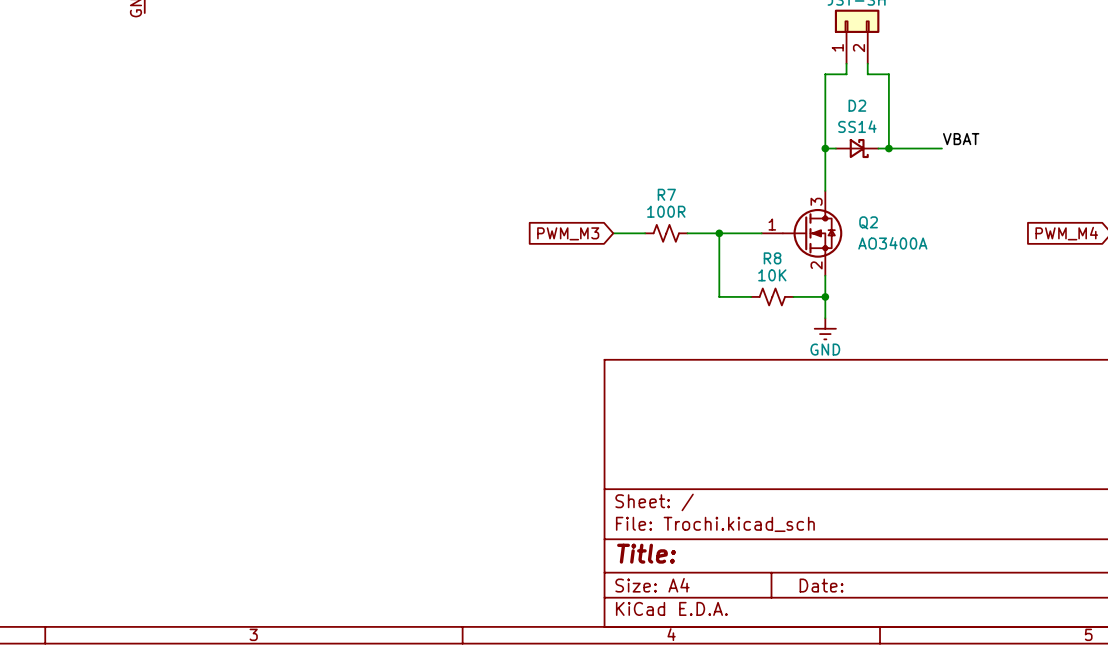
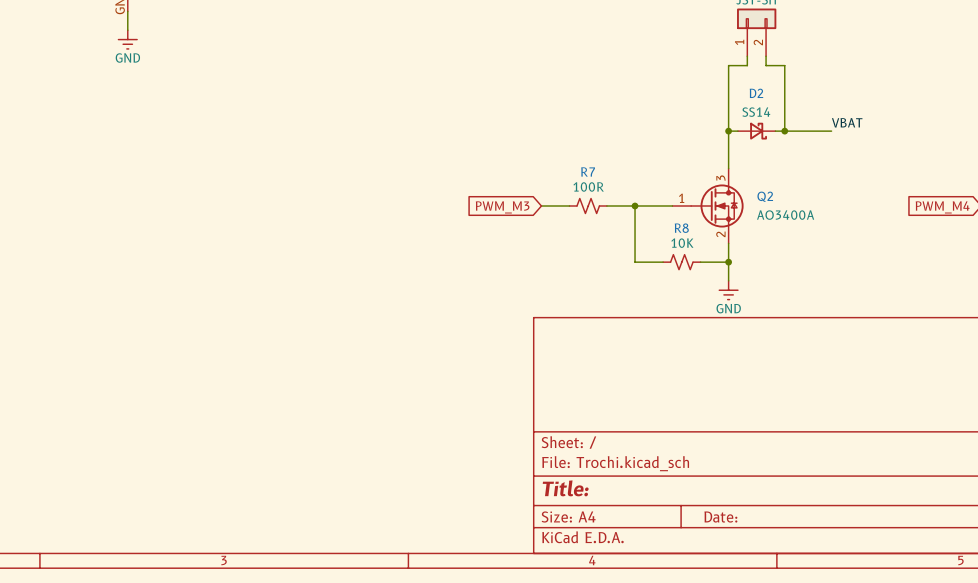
wire: none -> (127, 11) (127, 30)
power symbol: none -> GND (127, 39)

